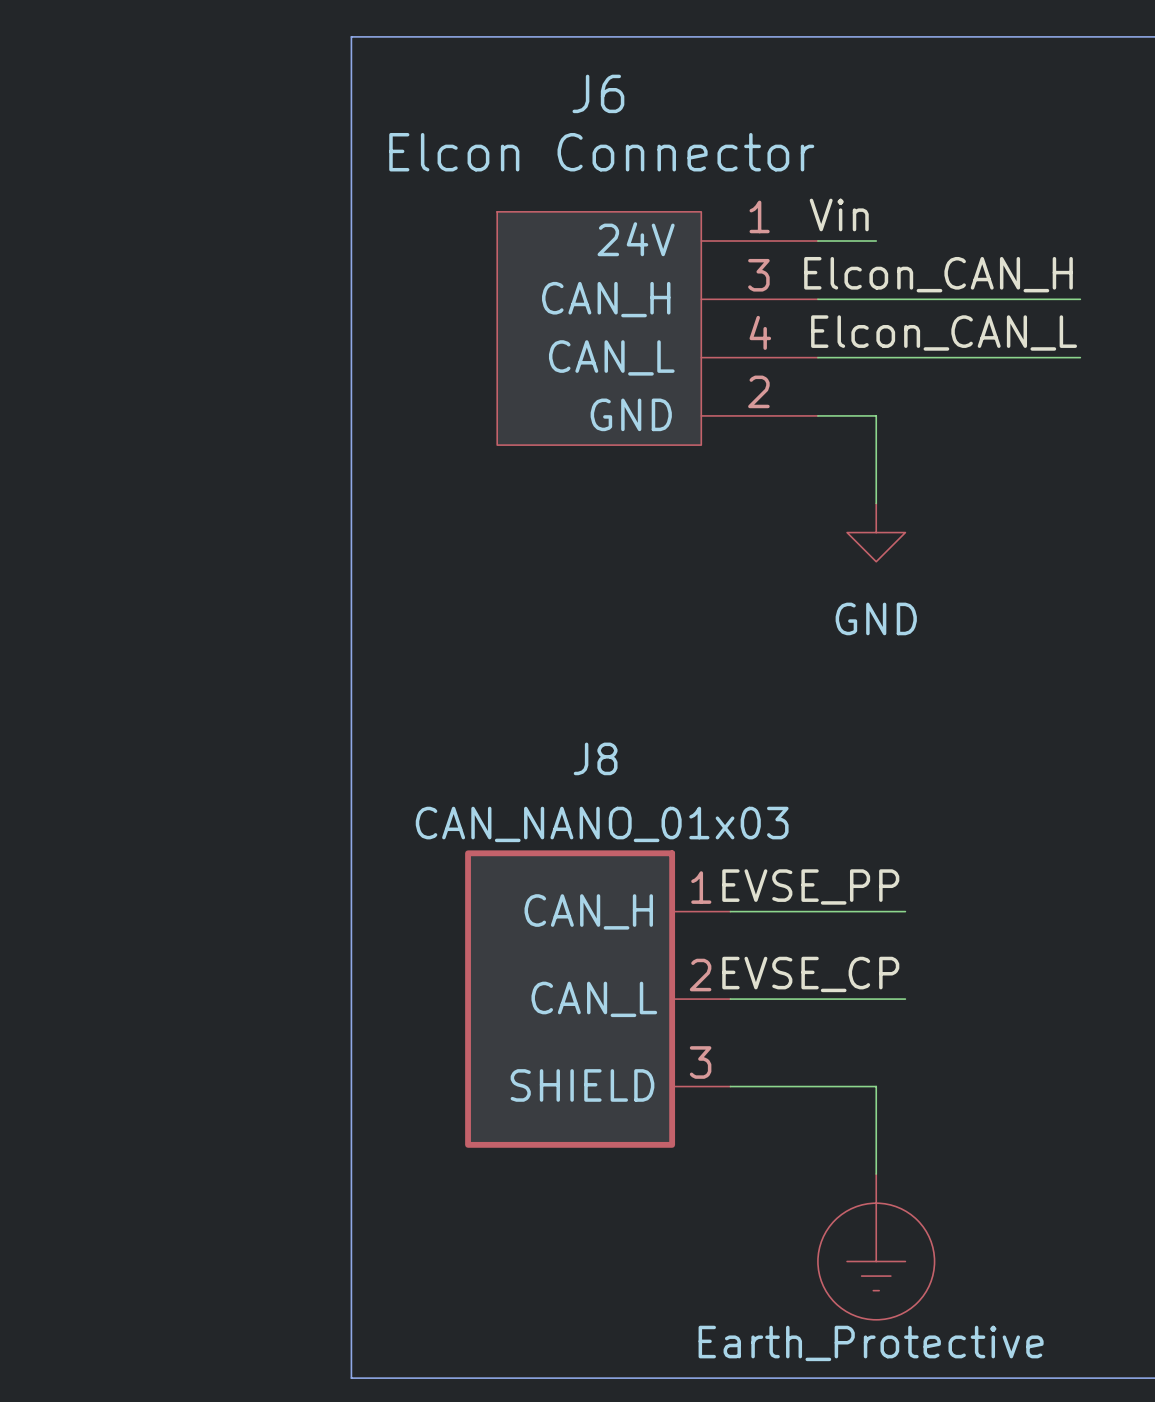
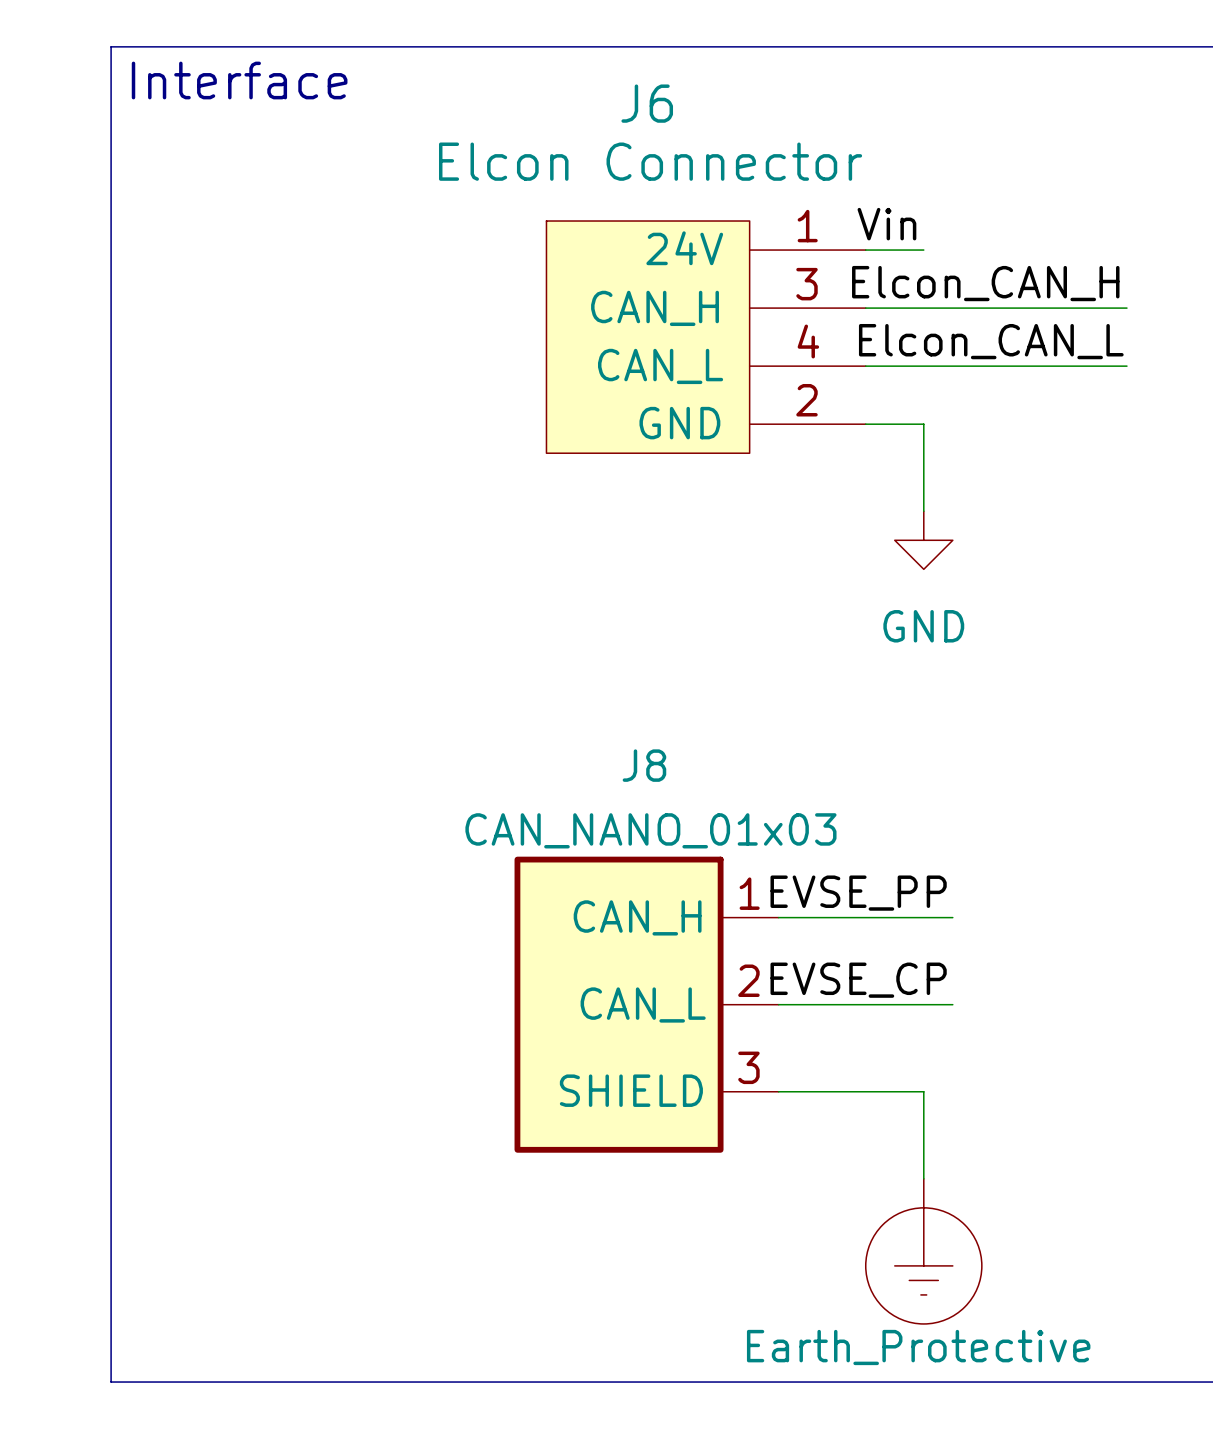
line: (351, 36) (351, 1378) -> (401, 46) (111, 46) (111, 1382) (401, 1382)
text: none -> Interface (239, 80)

